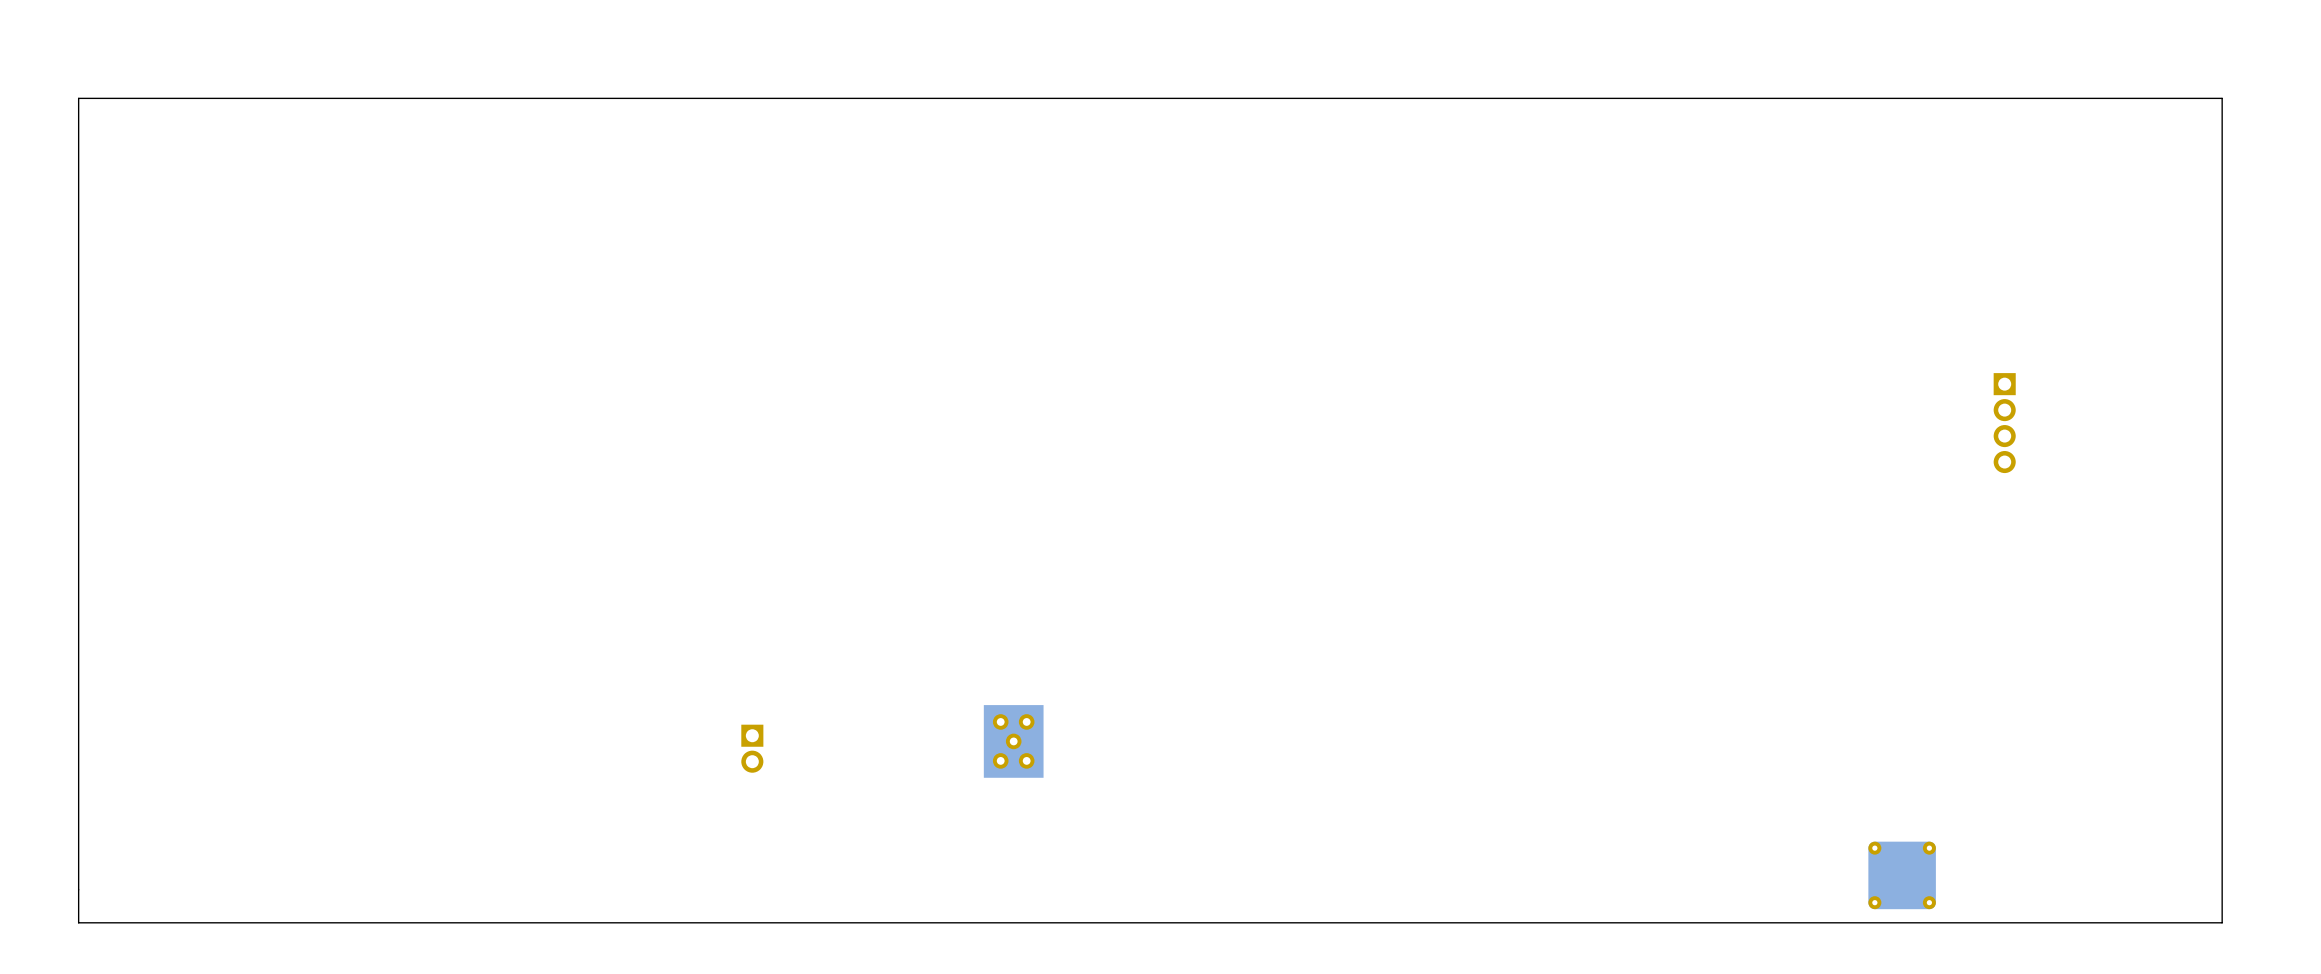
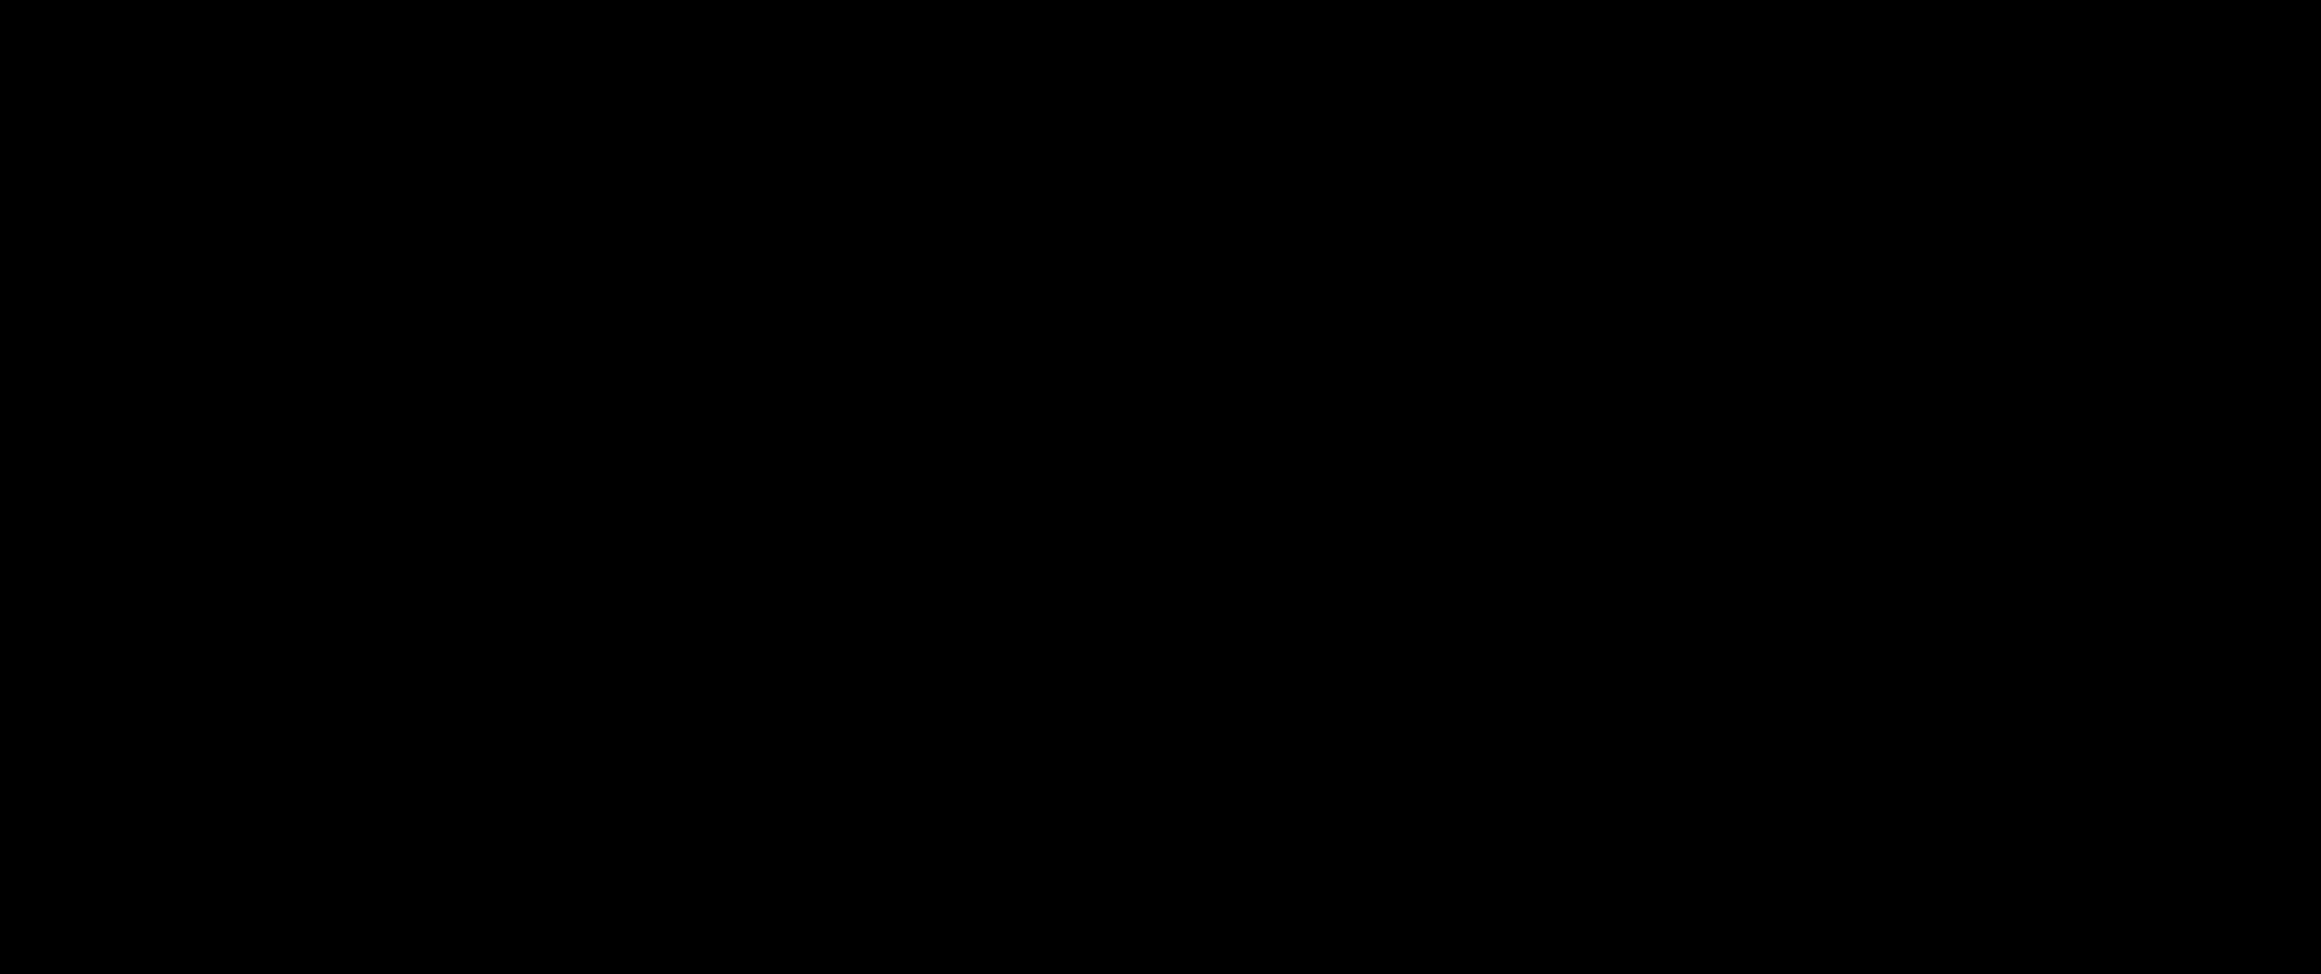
board edge: (2222, 98) (2222, 922) (78, 922) (78, 98) (2222, 98) -> none
part: (2004, 423) -> none
part: (1013, 741) -> none
part: (752, 748) -> none
part: (1902, 875) -> none

